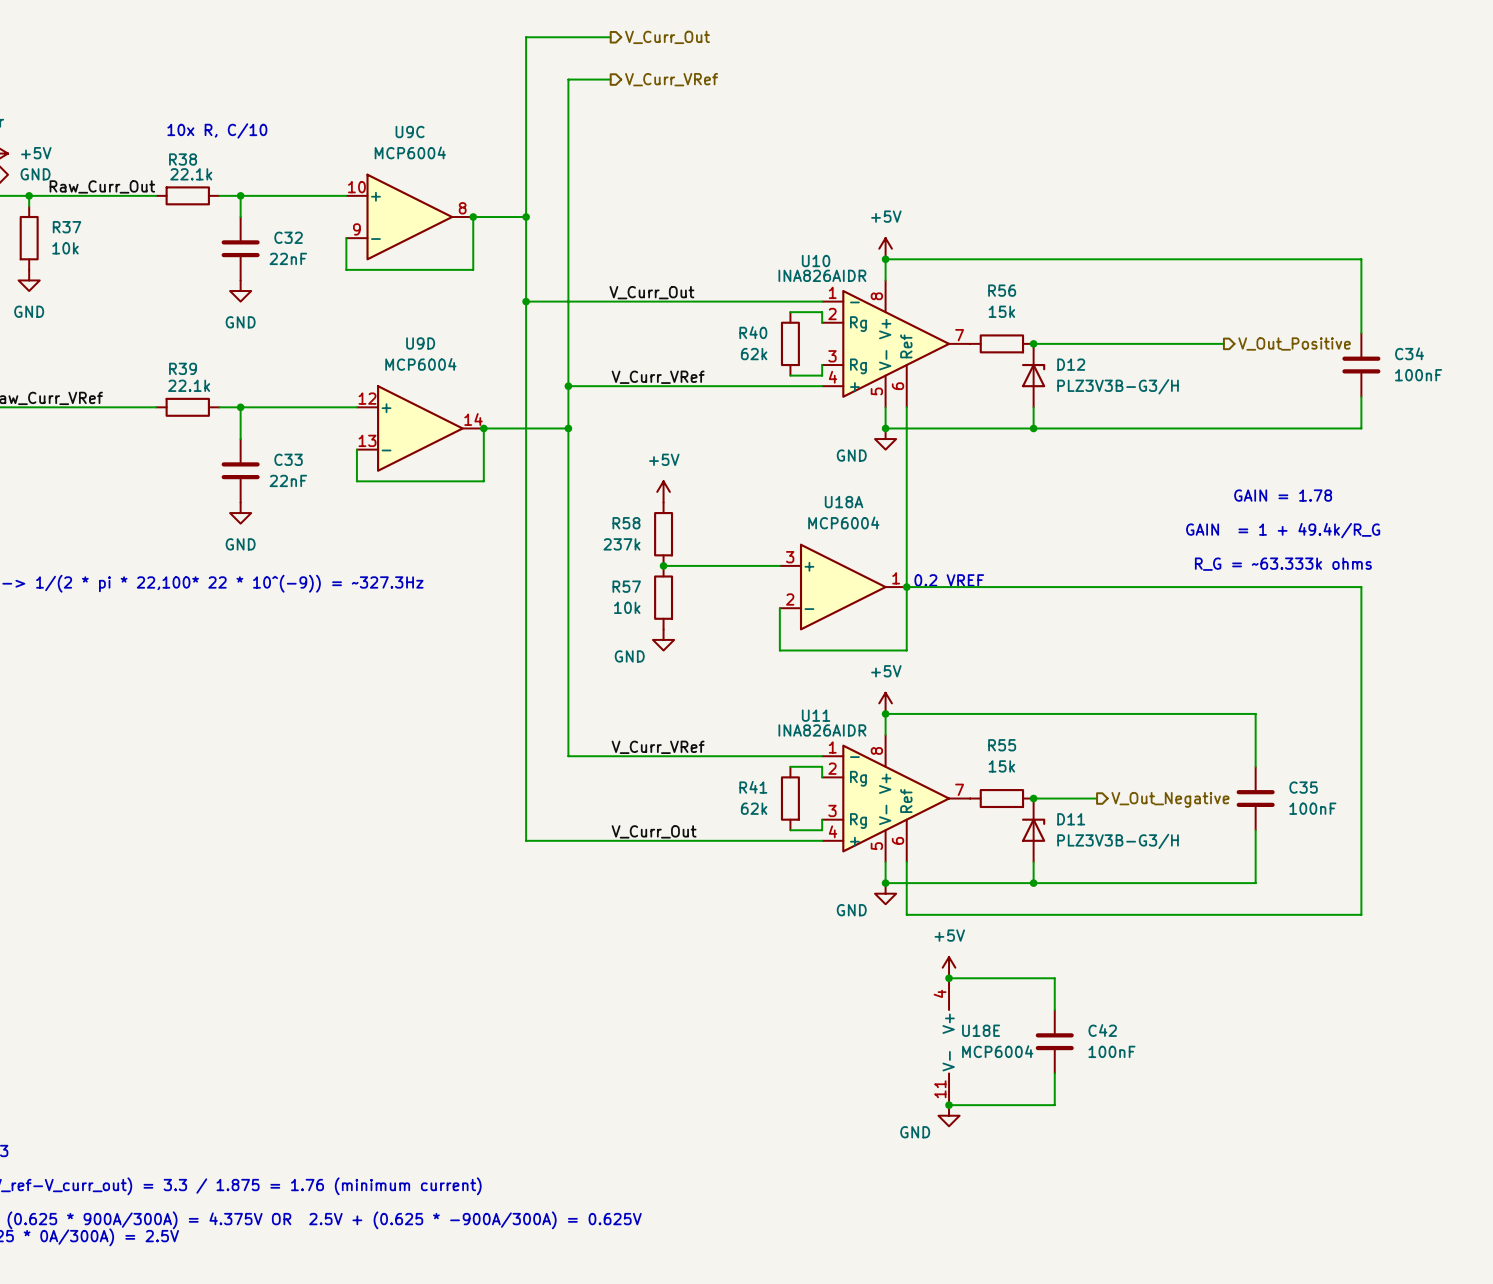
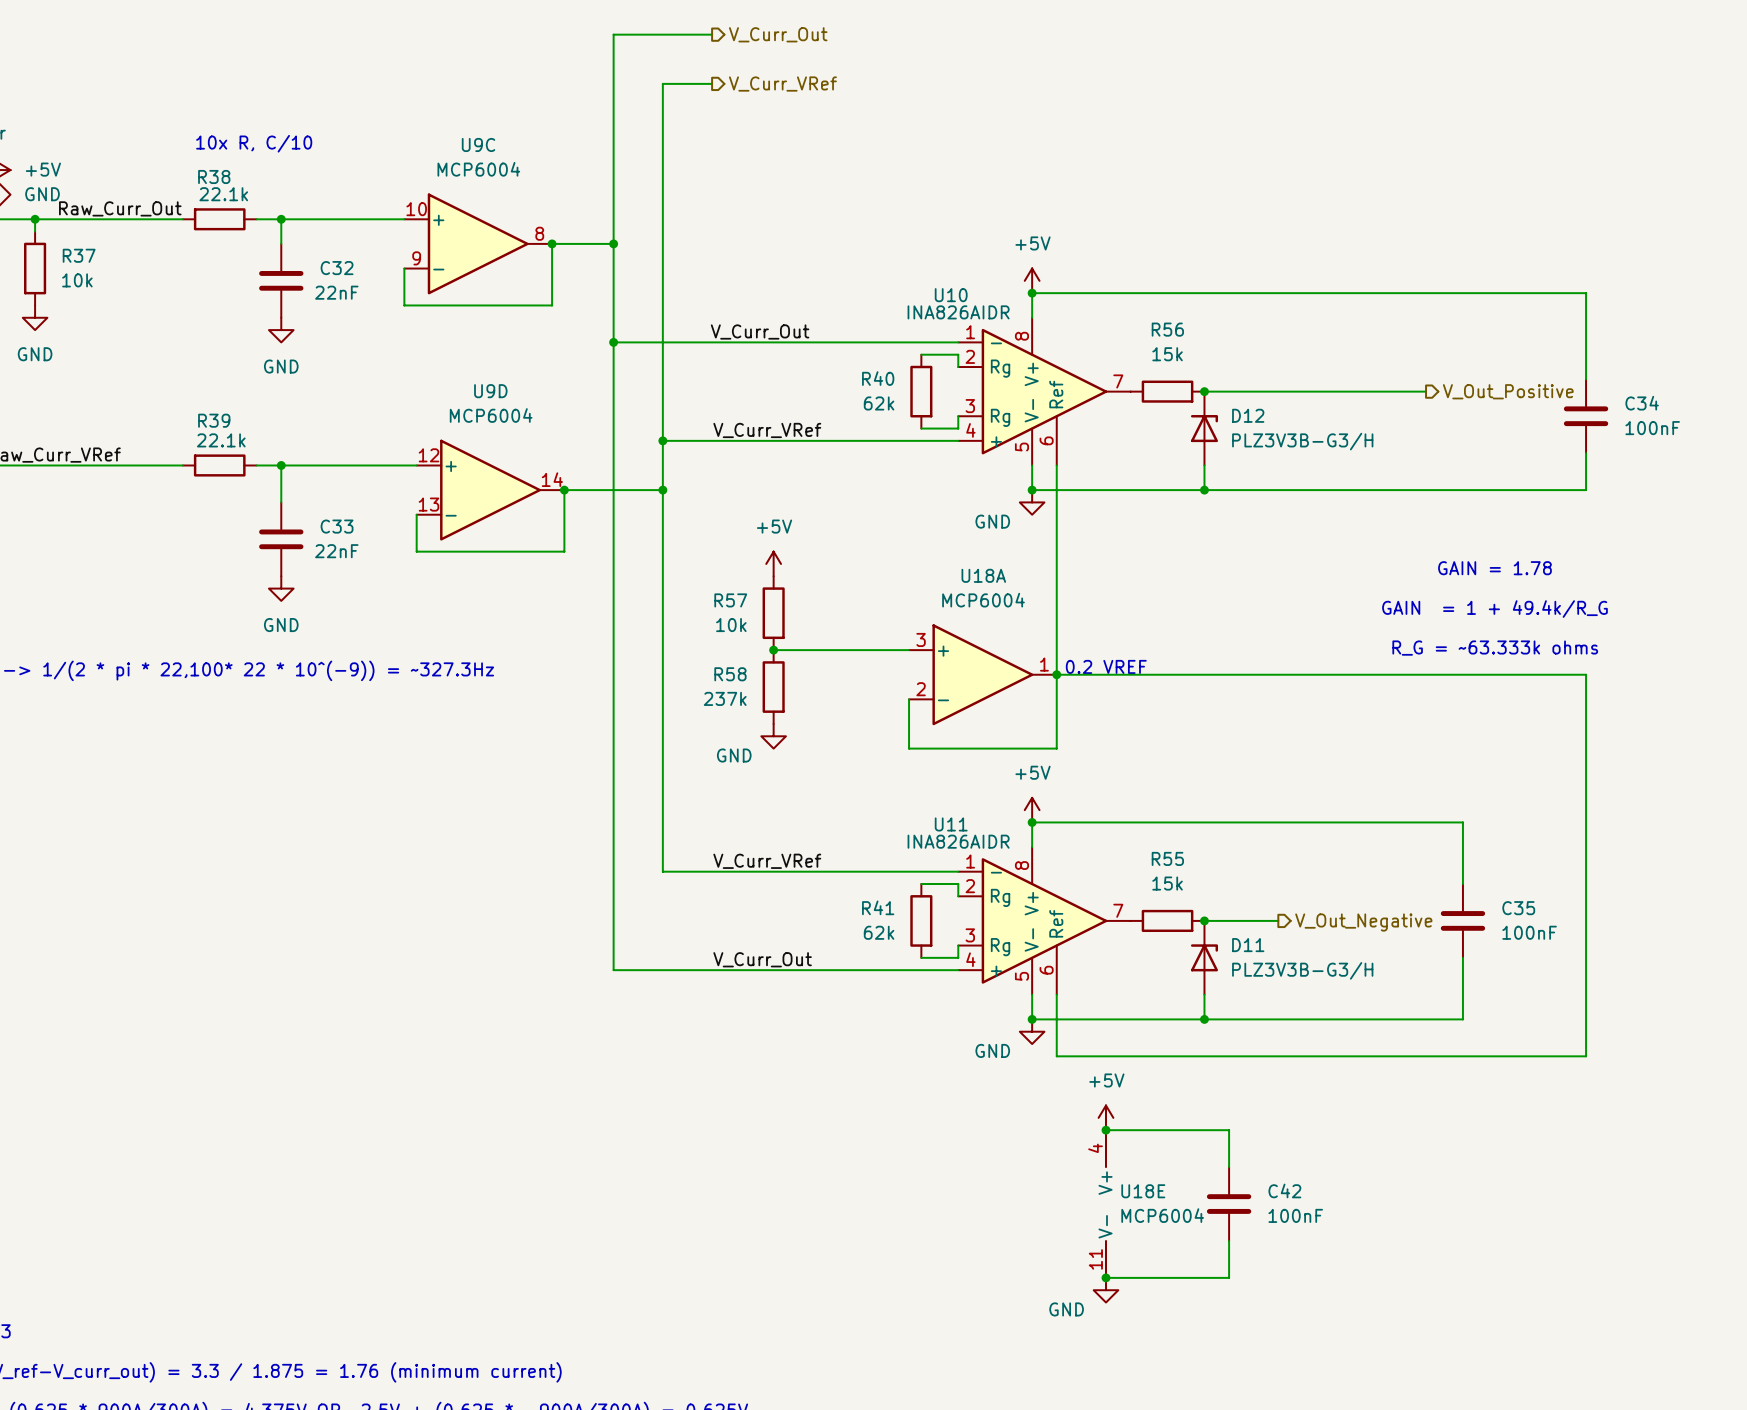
R58 name: R58 (626, 523) -> R57 (730, 600)
R58 value: 237k (621, 544) -> 10k (731, 625)
R57 name: R57 (626, 586) -> R58 (730, 674)
R57 value: 10k (627, 607) -> 237k (725, 698)

